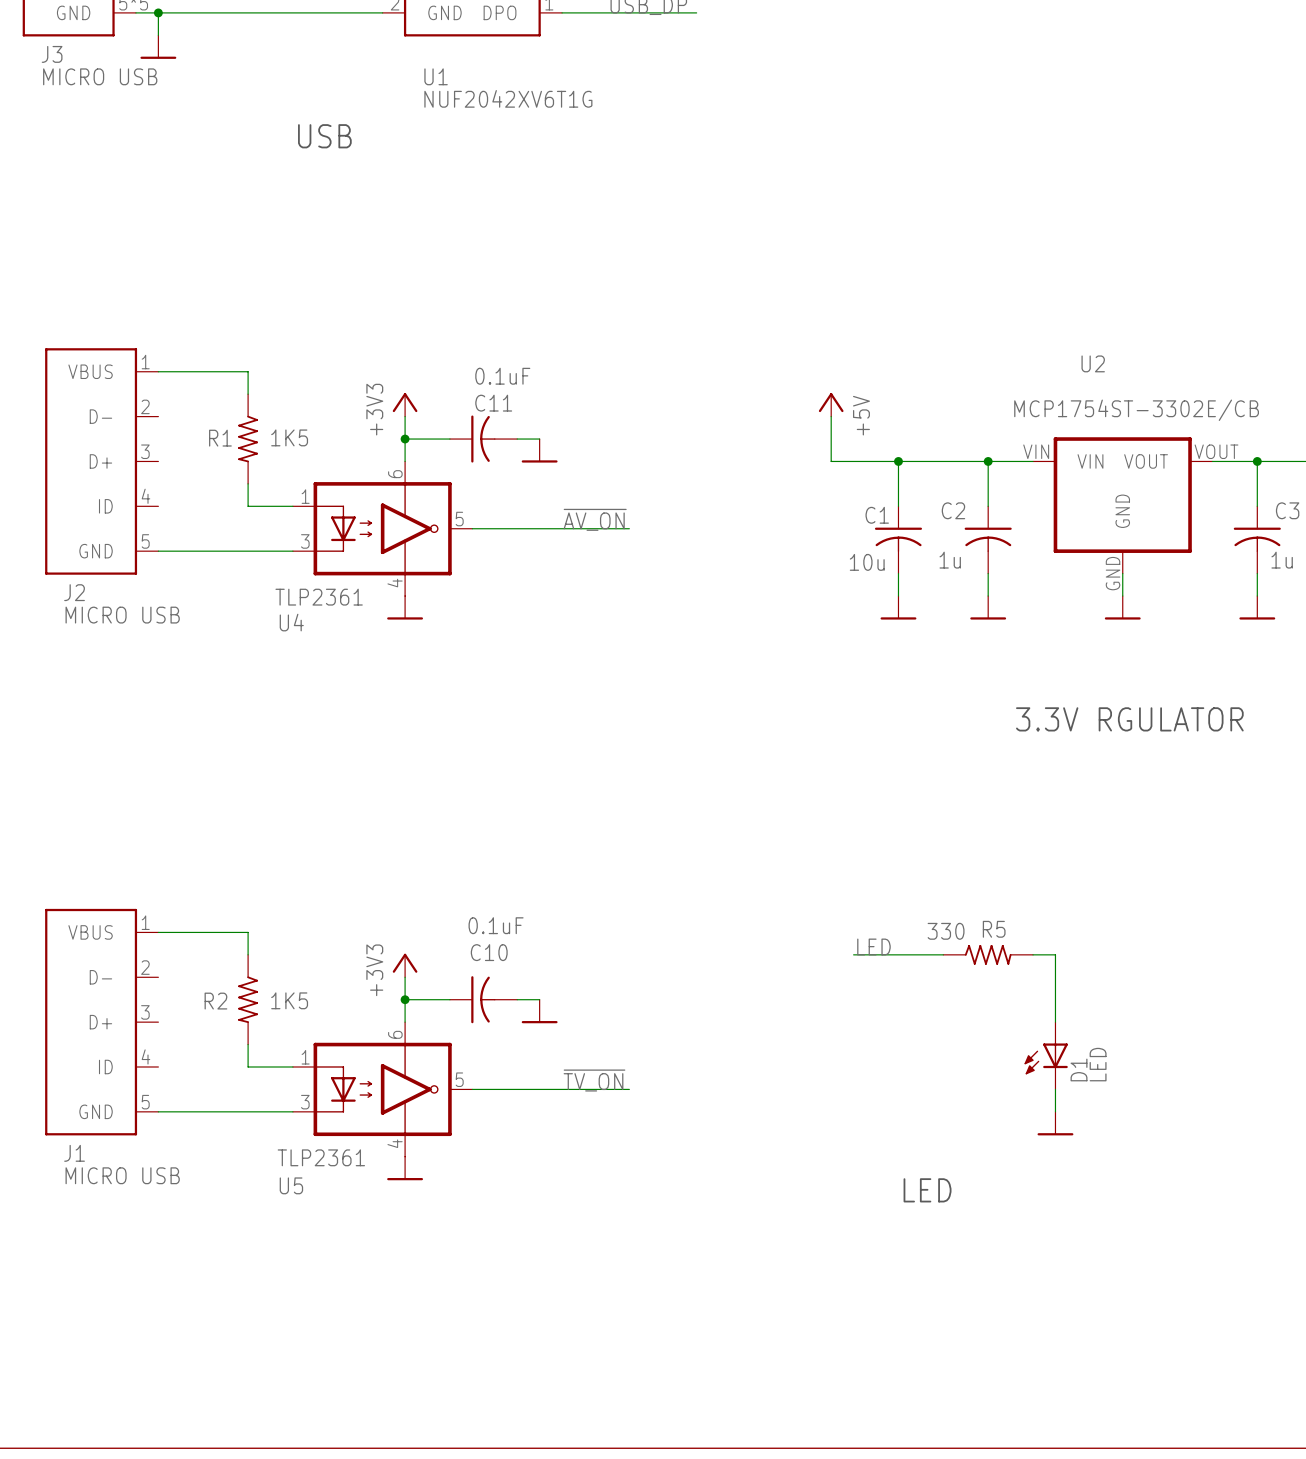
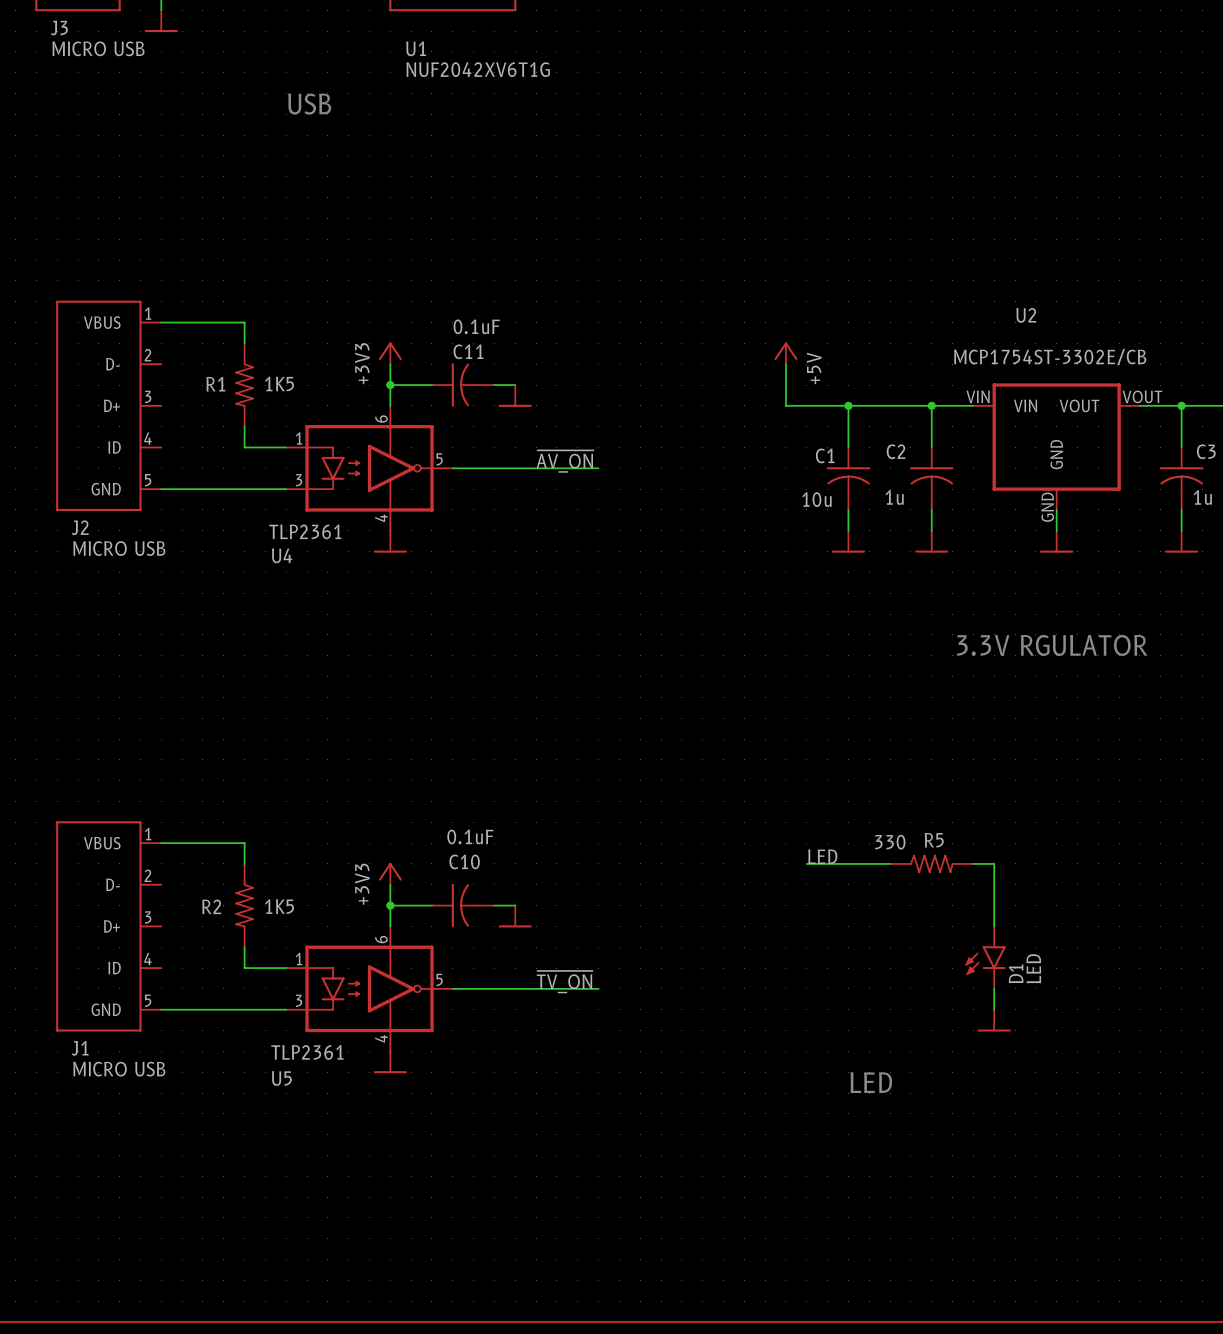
U4 symbol: [292, 461, 473, 597] -> [286, 405, 453, 531]
U5 symbol: [292, 1022, 473, 1157] -> [286, 926, 453, 1052]
D1 symbol: [1024, 1022, 1068, 1090] -> [965, 926, 1006, 989]

